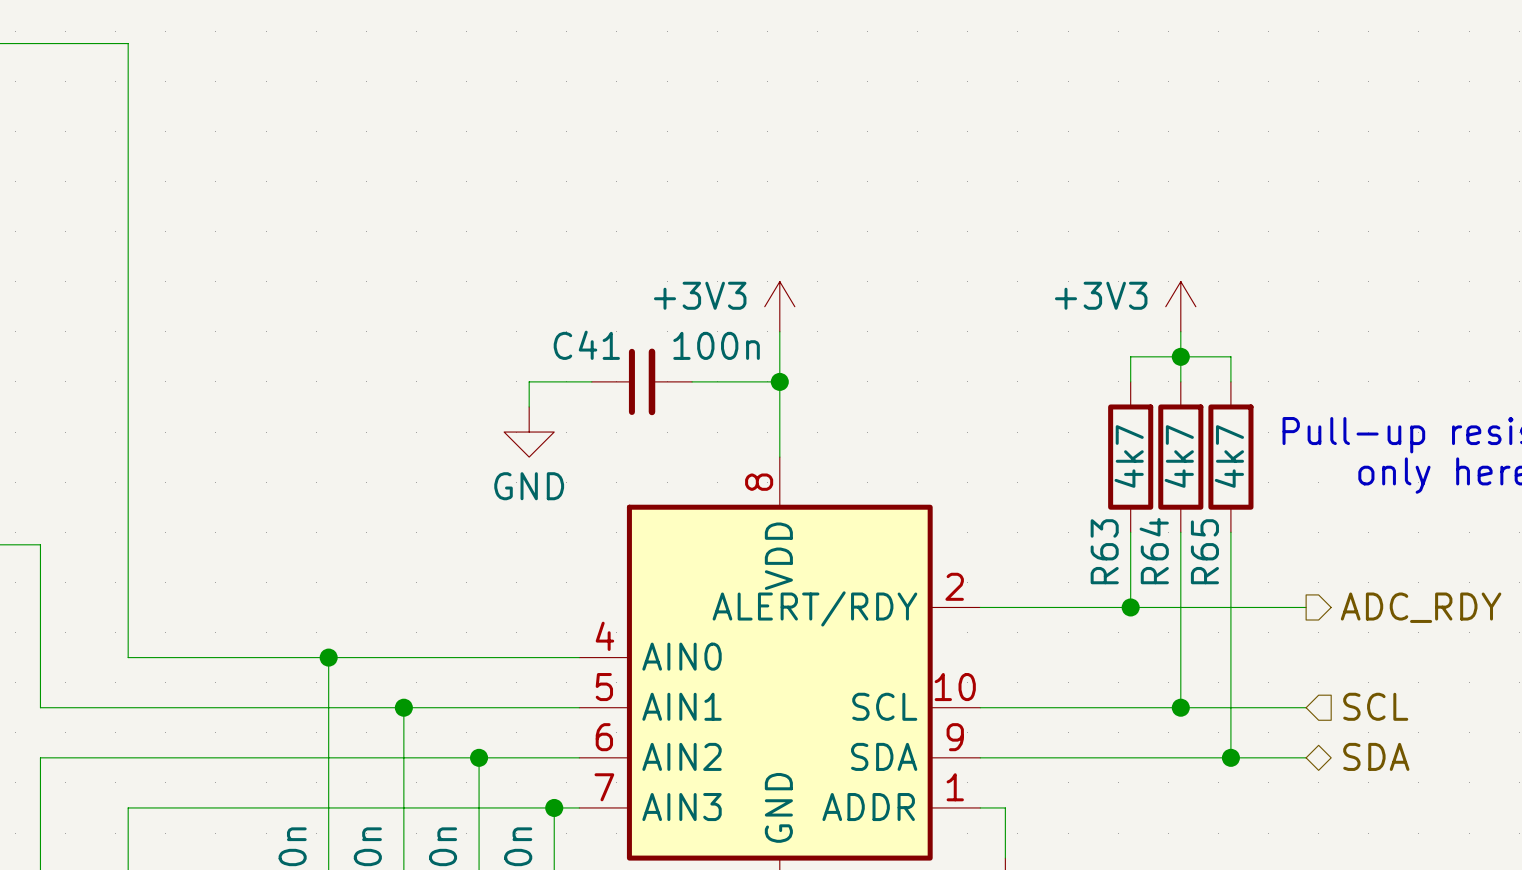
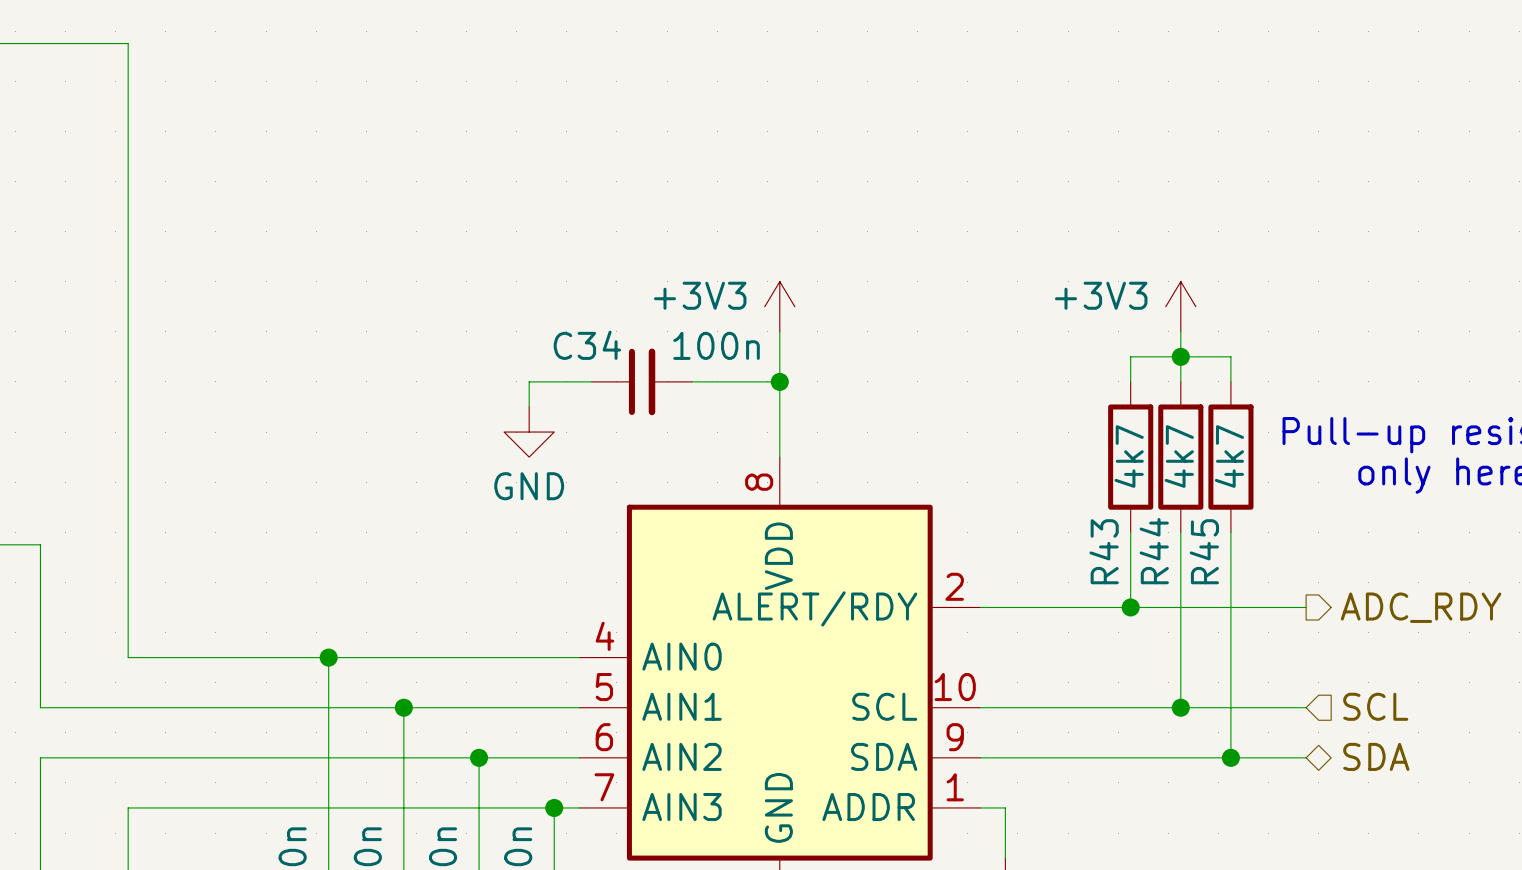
C41 name: C41 (586, 345) -> C34 (587, 345)
R63 name: R63 (1104, 551) -> R43 (1104, 551)
R64 name: R64 (1154, 551) -> R44 (1154, 551)
R65 name: R65 (1204, 551) -> R45 (1204, 551)

